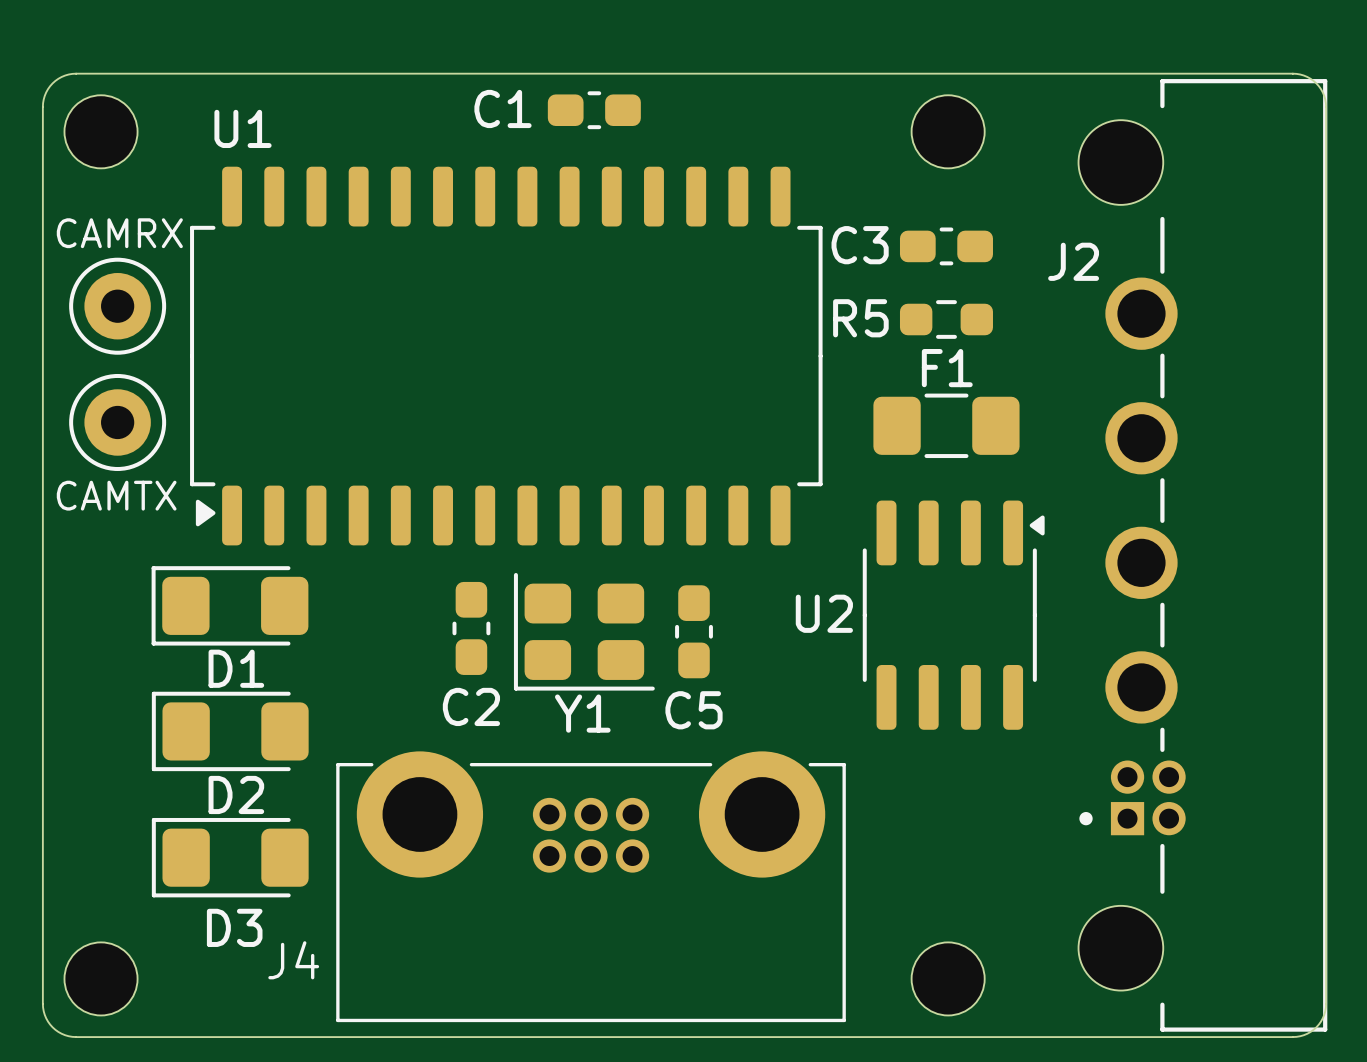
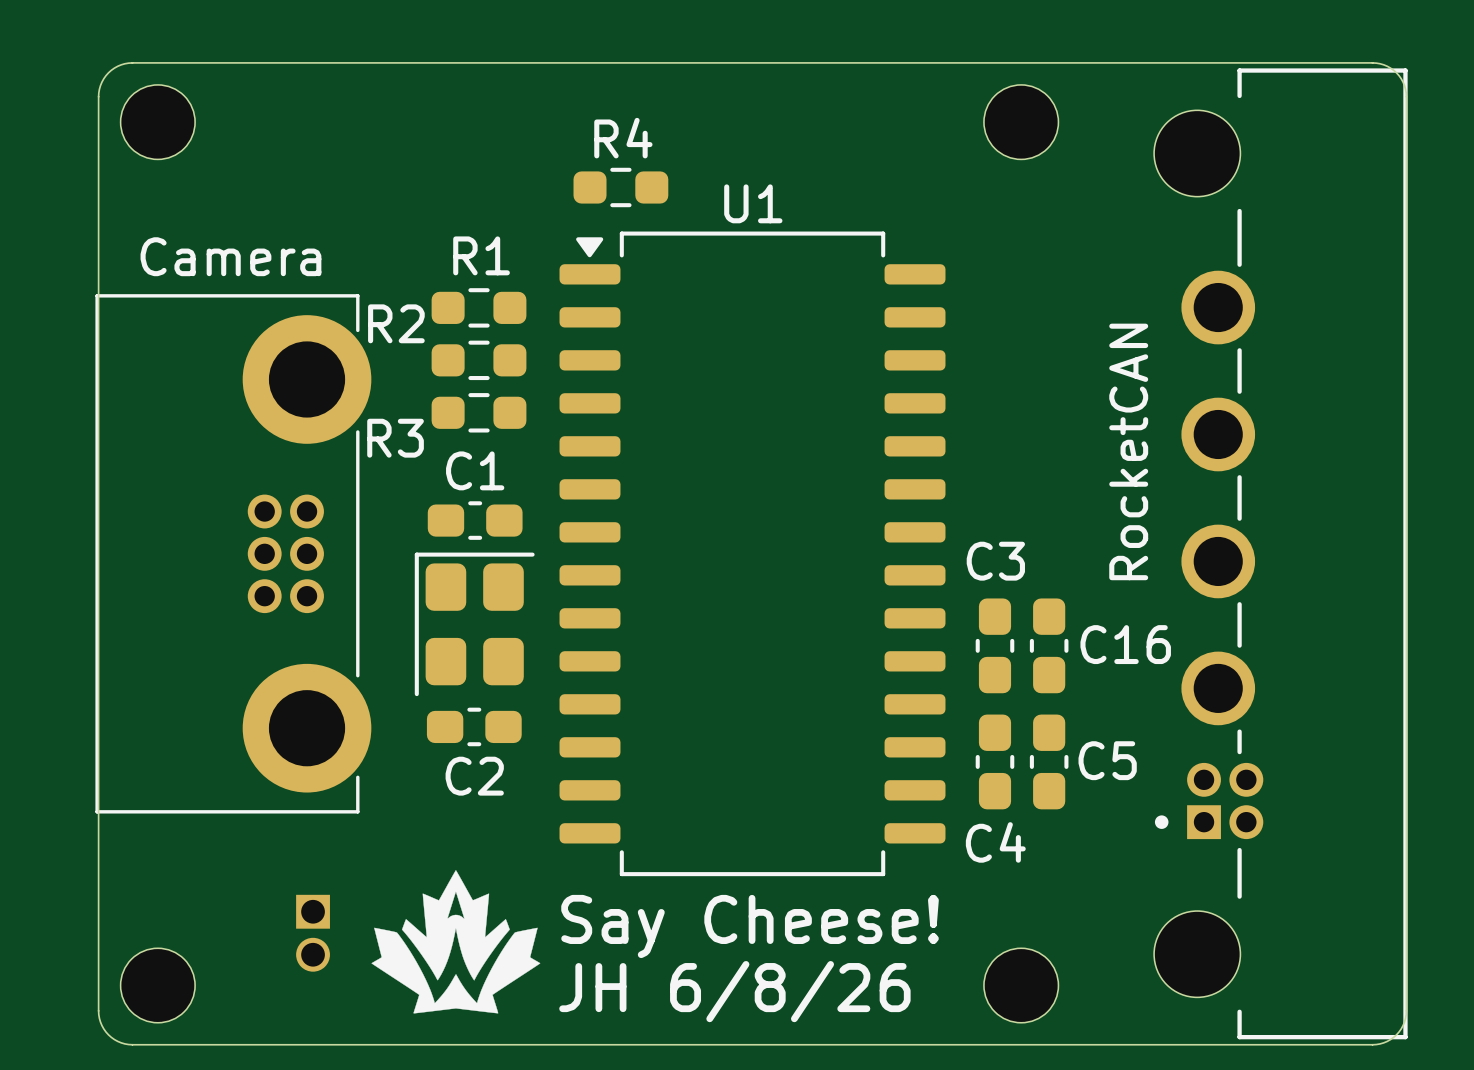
C1 name position: C1 (502, 108) -> C1 (475, 470)
C1 position: (594, 110) -> (475, 520)
U1 name position: U1 (243, 128) -> U1 (753, 203)
U1 footprint: [190, 166, 823, 546] -> [559, 231, 946, 877]
R4: none -> (620, 187)
text: CAMRX (119, 233) -> none
C3 rotation: 0° (946, 246) -> 90° clockwise (994, 645)
C3 position: (946, 246) -> (994, 645)
J2 name: J2 (1073, 261) -> none
text: none -> Camera (230, 256)
part: (117, 306) -> none
R1: none -> (479, 307)
R5: (946, 319) -> none
R2: none -> (479, 360)
R3: none -> (479, 412)
part: (117, 422) -> none
F1: (946, 425) -> none
text: none -> RocketCAN (1128, 451)
text: CAMTX (116, 495) -> none
part: none -> (233, 553)
D1: (230, 605) -> none
U2: (953, 615) -> none
part: none -> (474, 624)
C2 rotation: 0° (471, 628) -> 90° clockwise (474, 726)
C2 position: (471, 628) -> (474, 726)
Y1: (584, 631) -> none
C5 position: (694, 631) -> (1049, 761)
C16: none -> (1049, 645)
C5 name position: C5 (694, 710) -> C5 (1107, 760)
D2: (230, 731) -> none
C4: none -> (994, 761)
D3: (230, 857) -> none
drawing: none -> [371, 870, 541, 1014]
J4: (591, 886) -> none
text: none -> Say Cheese! (750, 926)
part: none -> (313, 933)
text: none -> JH 6/8/26 (734, 991)

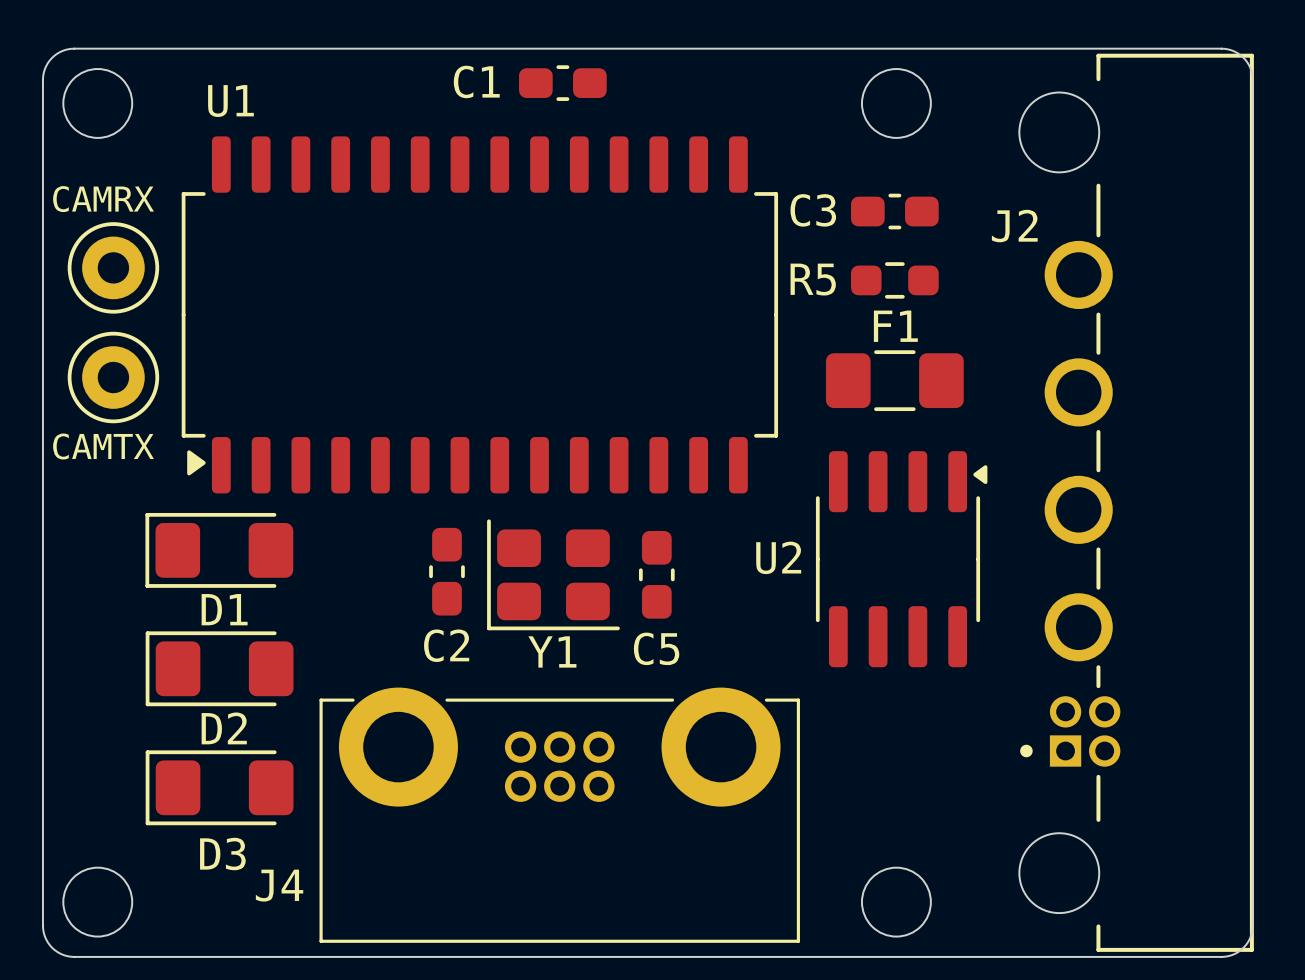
R4: (620, 187) -> none
U1 name position: U1 (753, 203) -> U1 (230, 101)
text: none -> CAMRX (103, 199)
U1 footprint: [559, 231, 946, 877] -> [181, 136, 779, 494]
J2 name: none -> J2 (1014, 226)
text: Camera (230, 256) -> none
part: none -> (113, 267)
R1: (479, 307) -> none
R5: none -> (894, 280)
R2: (479, 360) -> none
R3: (479, 412) -> none
part: none -> (113, 377)
F1: none -> (894, 380)
text: RocketCAN (1128, 451) -> none
C1 name position: C1 (475, 470) -> C1 (476, 81)
text: none -> CAMTX (103, 446)
C1 position: (475, 520) -> (562, 83)
part: (233, 553) -> none
C3 name position: C3 (995, 561) -> C3 (813, 210)
D1: none -> (219, 550)
U2: none -> (901, 559)
part: (474, 624) -> none
Y1: none -> (553, 574)
C3 rotation: 0° (994, 645) -> 90° clockwise (894, 211)
C3 position: (994, 645) -> (894, 211)
C16: (1049, 645) -> none
C2 rotation: 0° (474, 726) -> 90° clockwise (446, 571)
C2 position: (474, 726) -> (446, 571)
D2: none -> (219, 668)
C5 name position: C5 (1107, 760) -> C5 (656, 648)
C4: (994, 761) -> none
C5 position: (1049, 761) -> (656, 574)
D3: none -> (219, 787)
drawing: [371, 870, 541, 1014] -> none
J4: none -> (559, 815)
text: Say Cheese! (750, 926) -> none
part: (313, 933) -> none
text: JH 6/8/26 (734, 991) -> none

